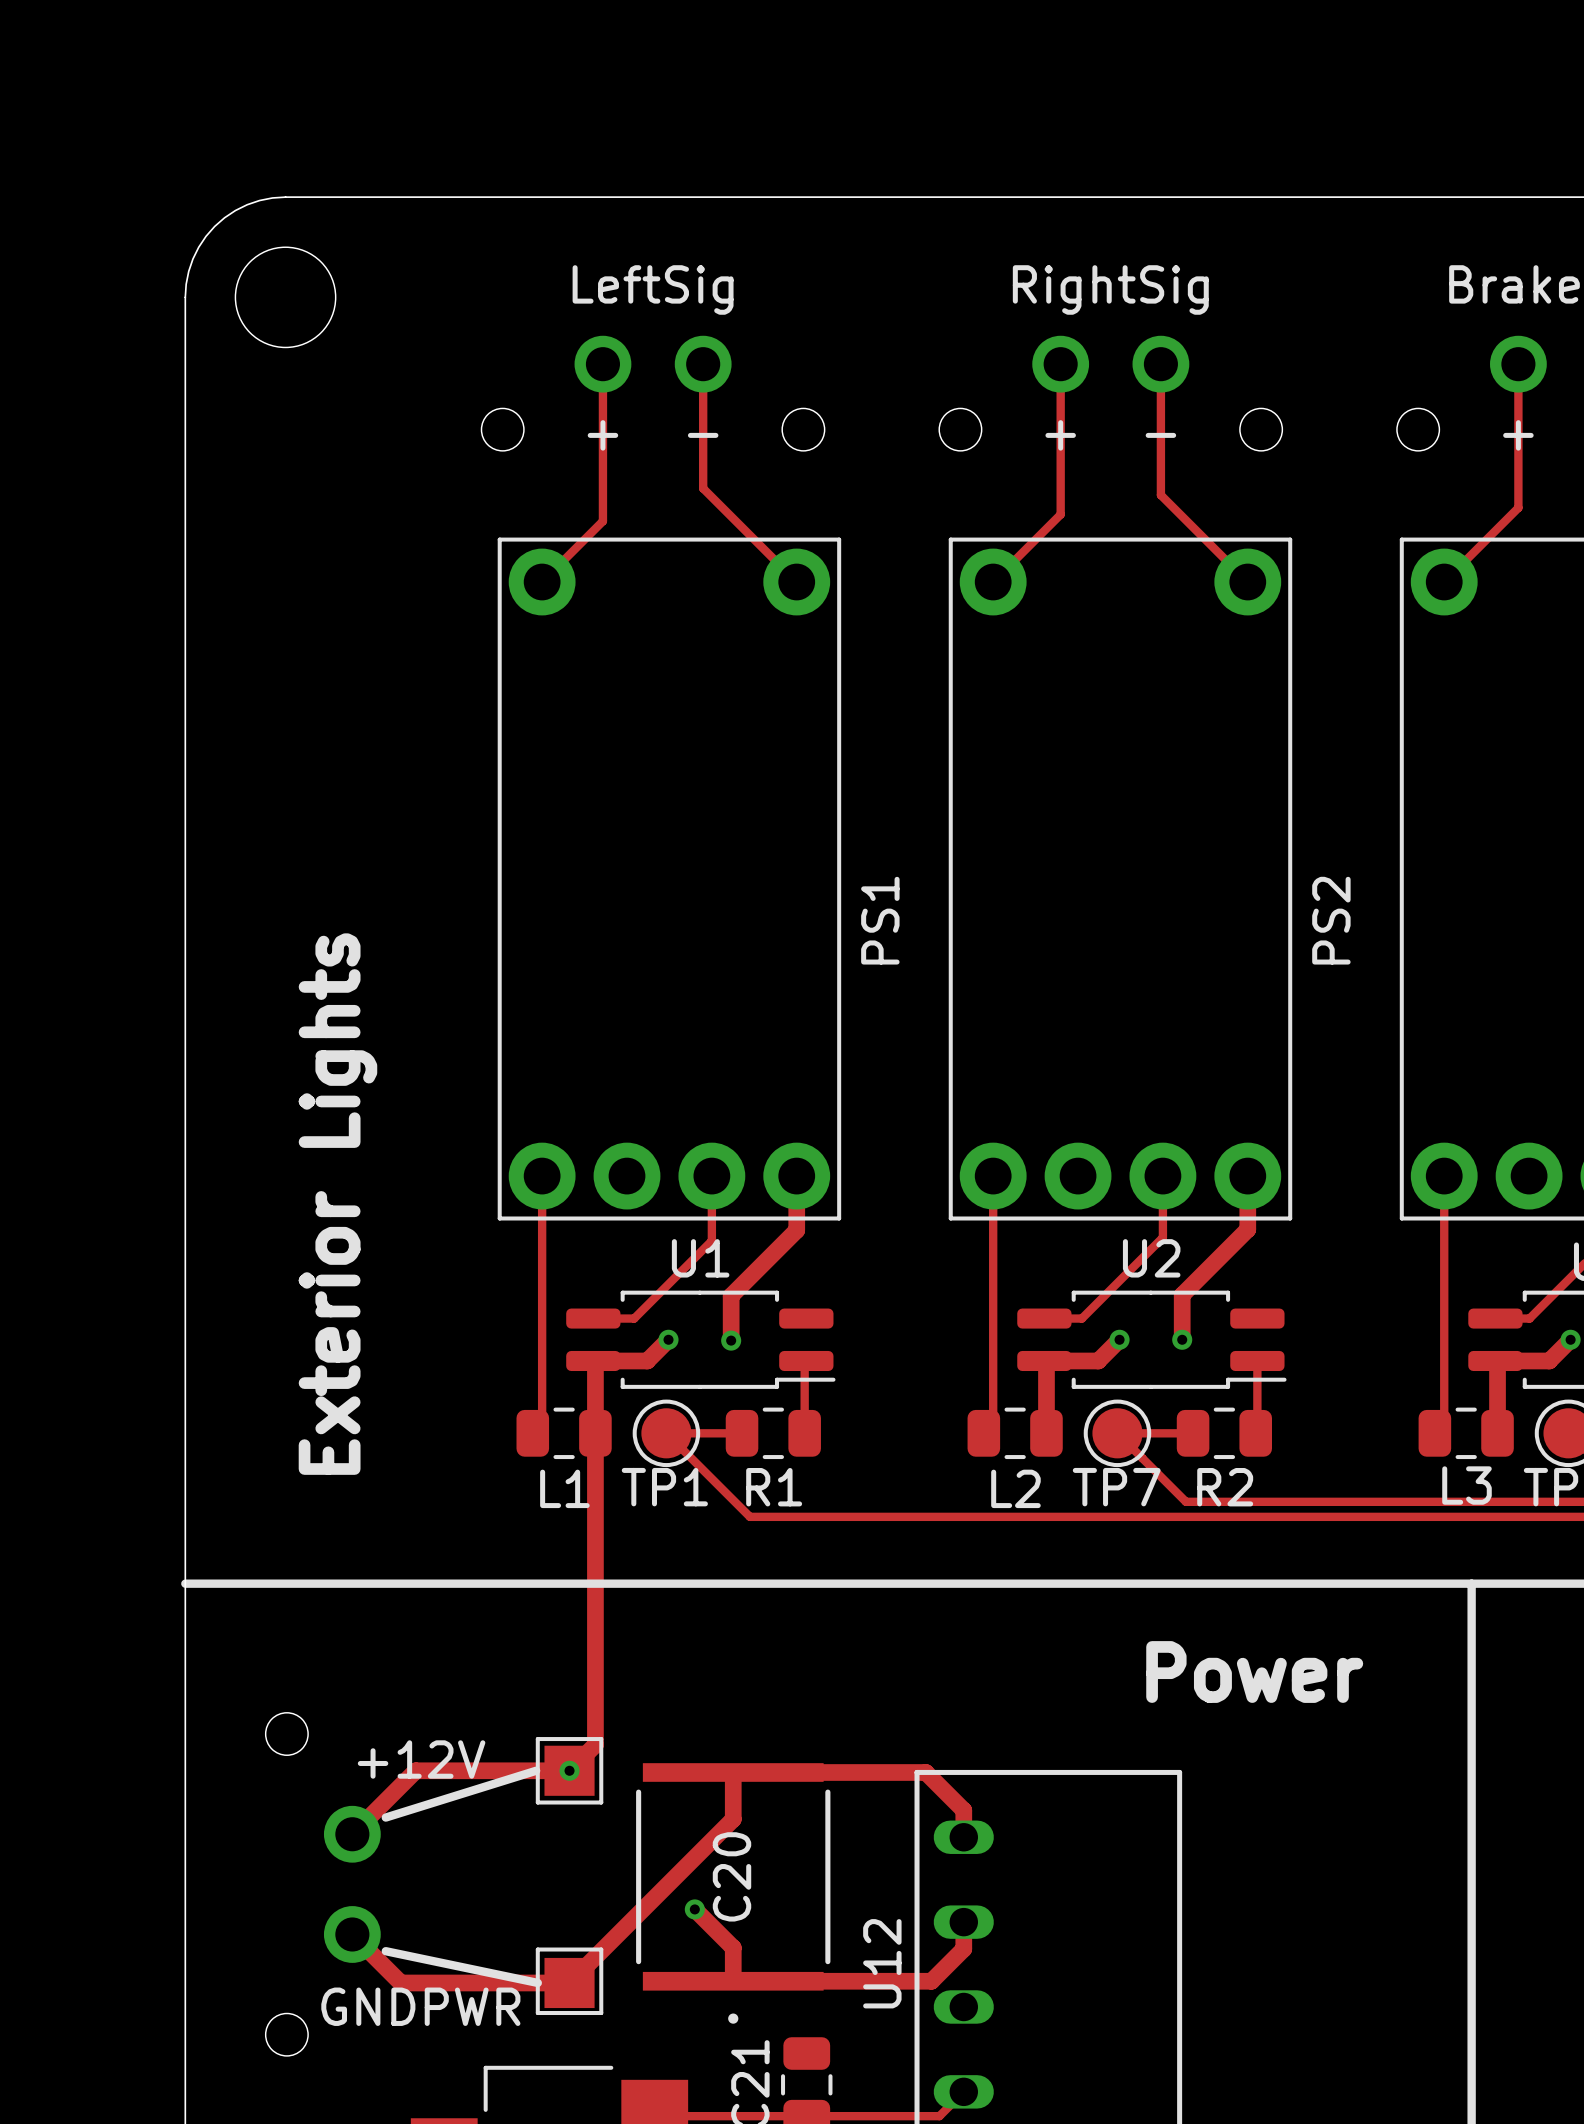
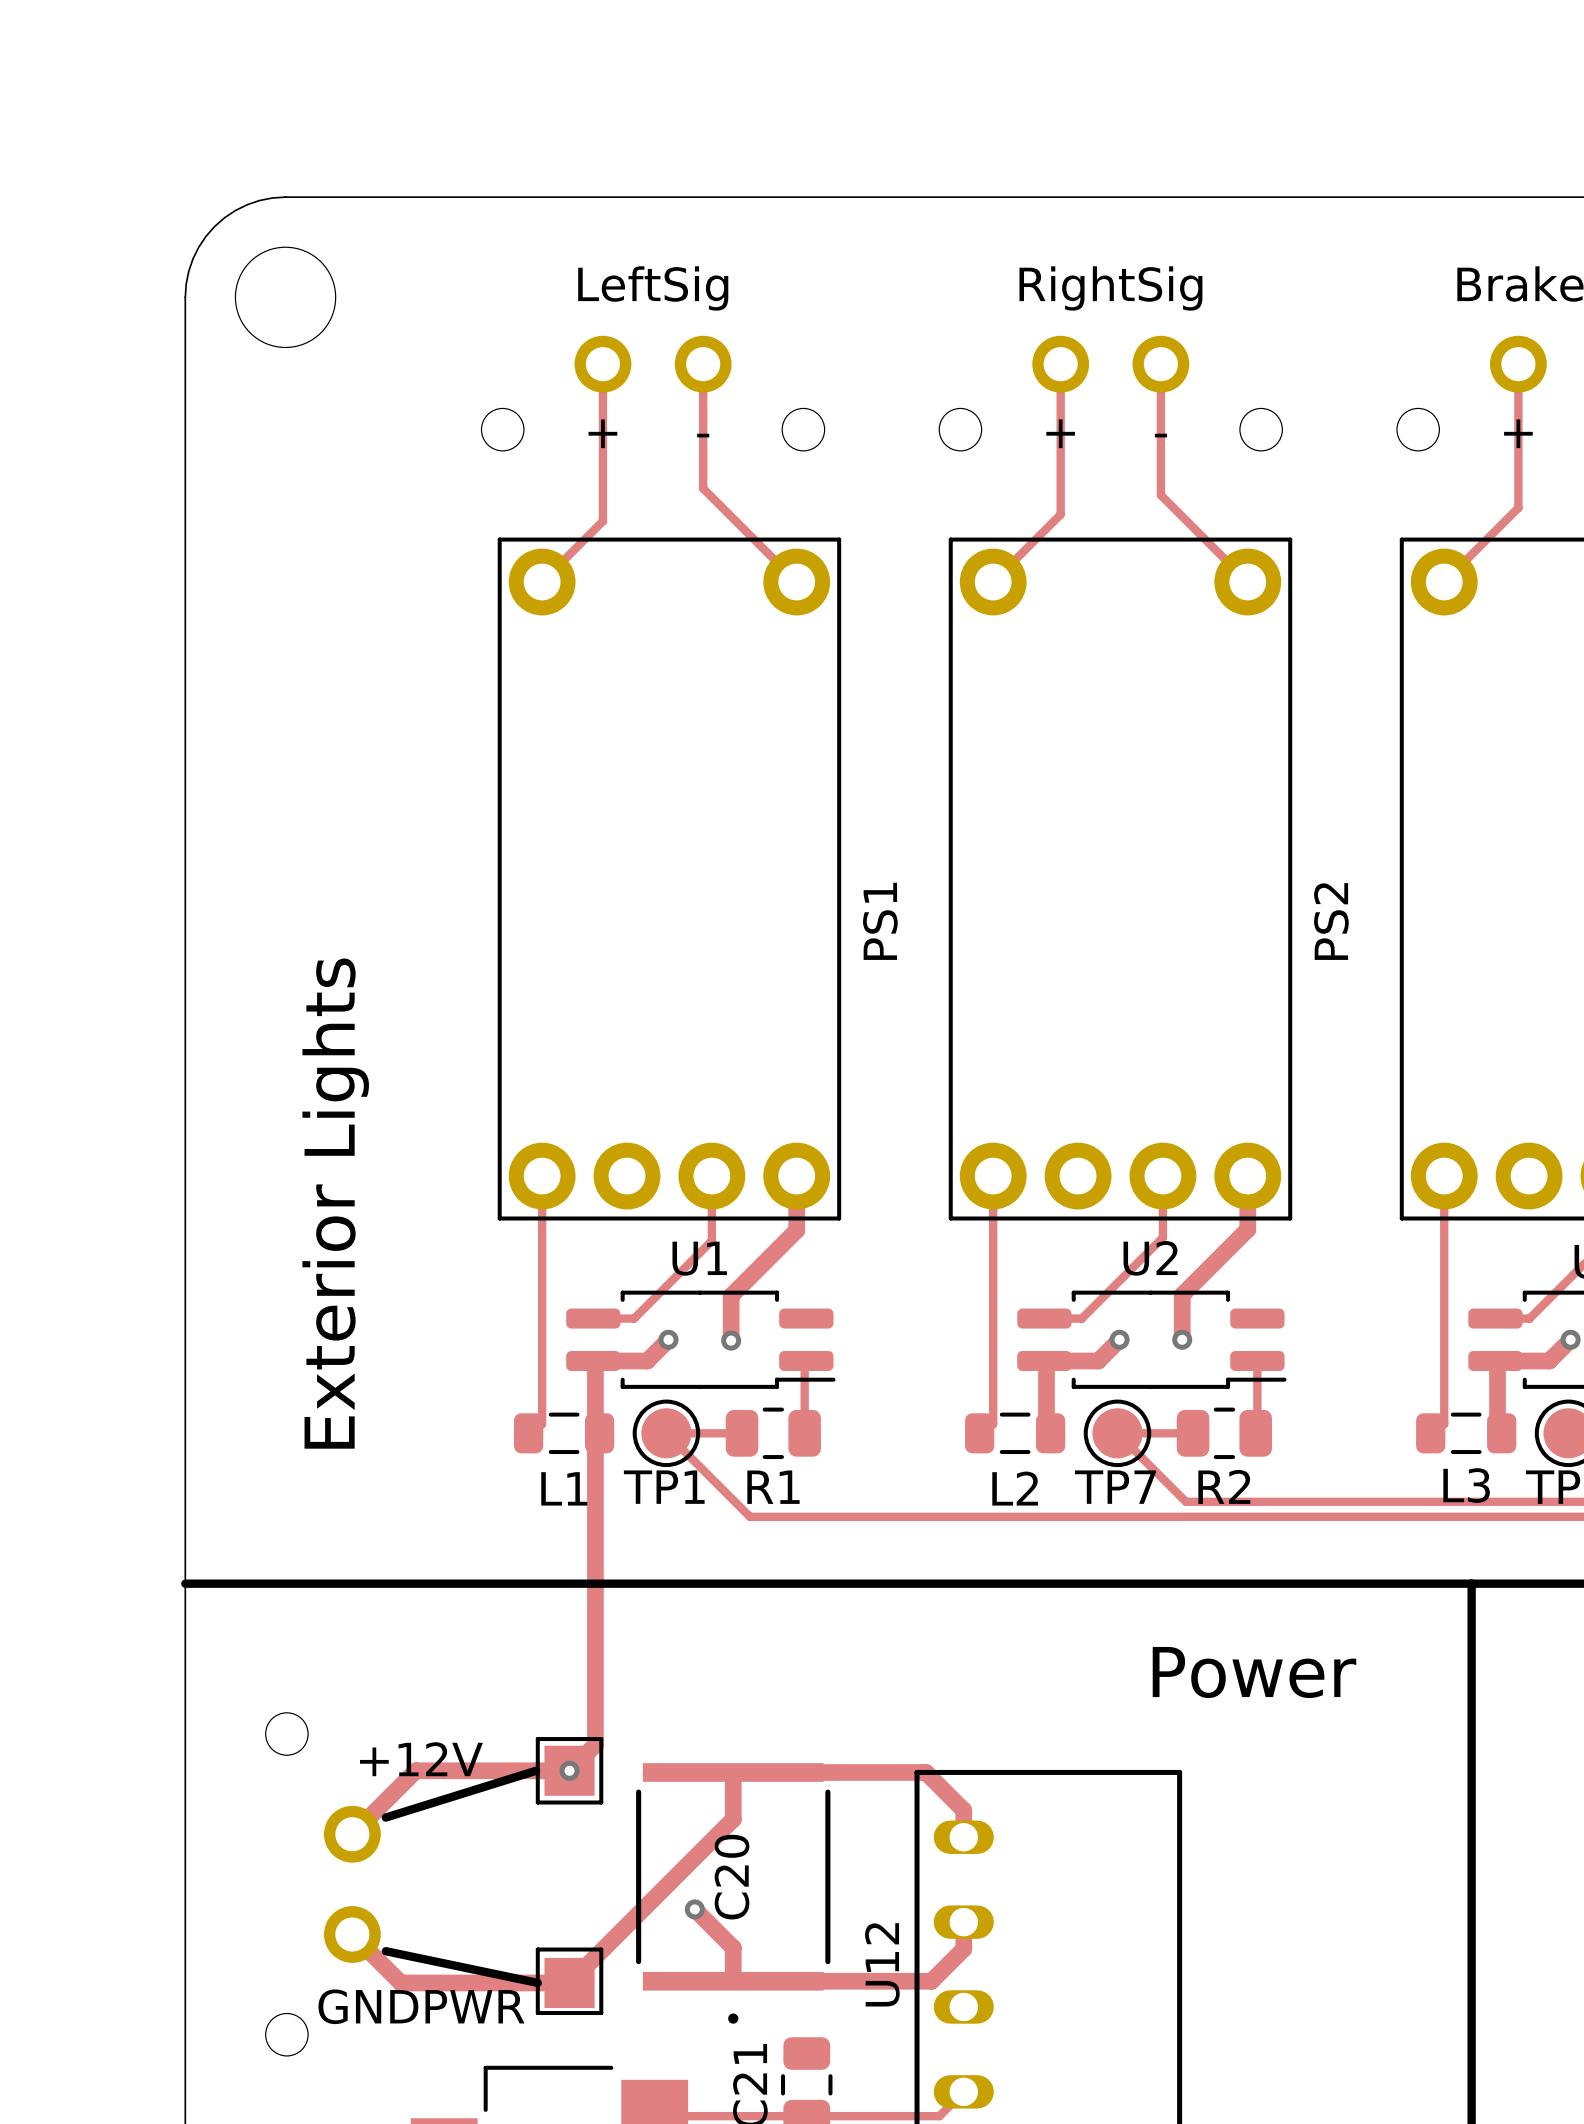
L1 footprint: [516, 1407, 612, 1460] -> [513, 1412, 615, 1455]
L2 footprint: [967, 1407, 1063, 1460] -> [965, 1412, 1066, 1455]
L3 footprint: [1418, 1407, 1514, 1460] -> [1416, 1412, 1517, 1455]

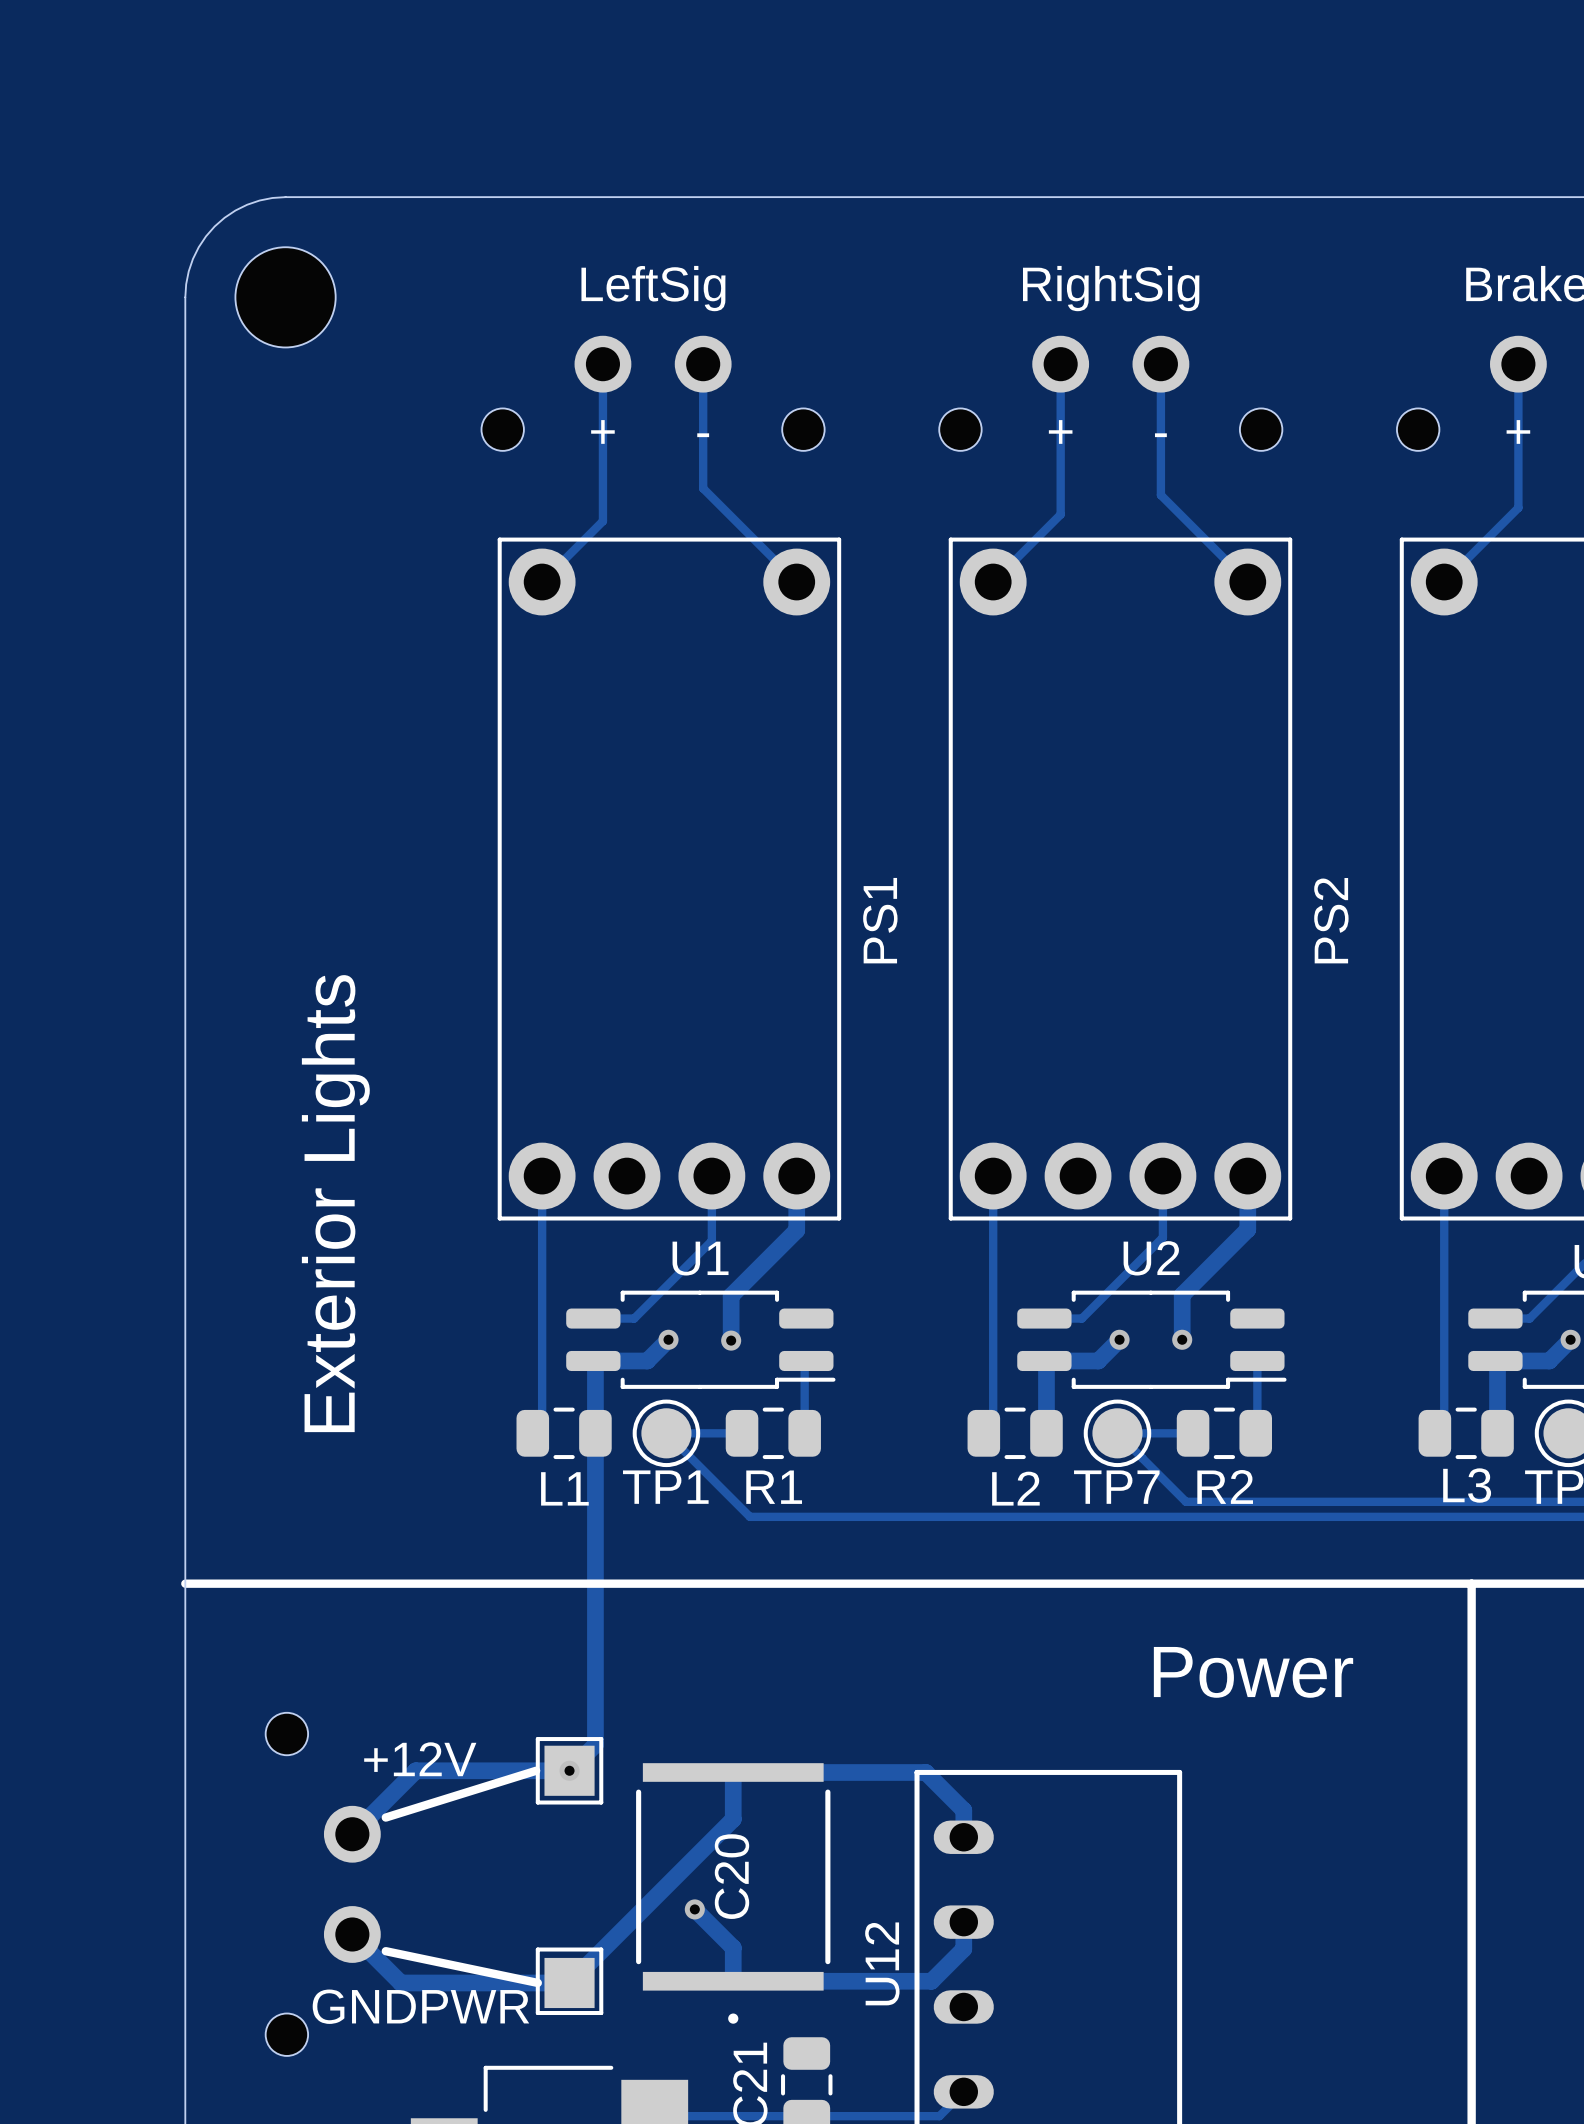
L1 footprint: [513, 1412, 615, 1455] -> [516, 1407, 612, 1460]
L2 footprint: [965, 1412, 1066, 1455] -> [967, 1407, 1063, 1460]
L3 footprint: [1416, 1412, 1517, 1455] -> [1418, 1407, 1514, 1460]

